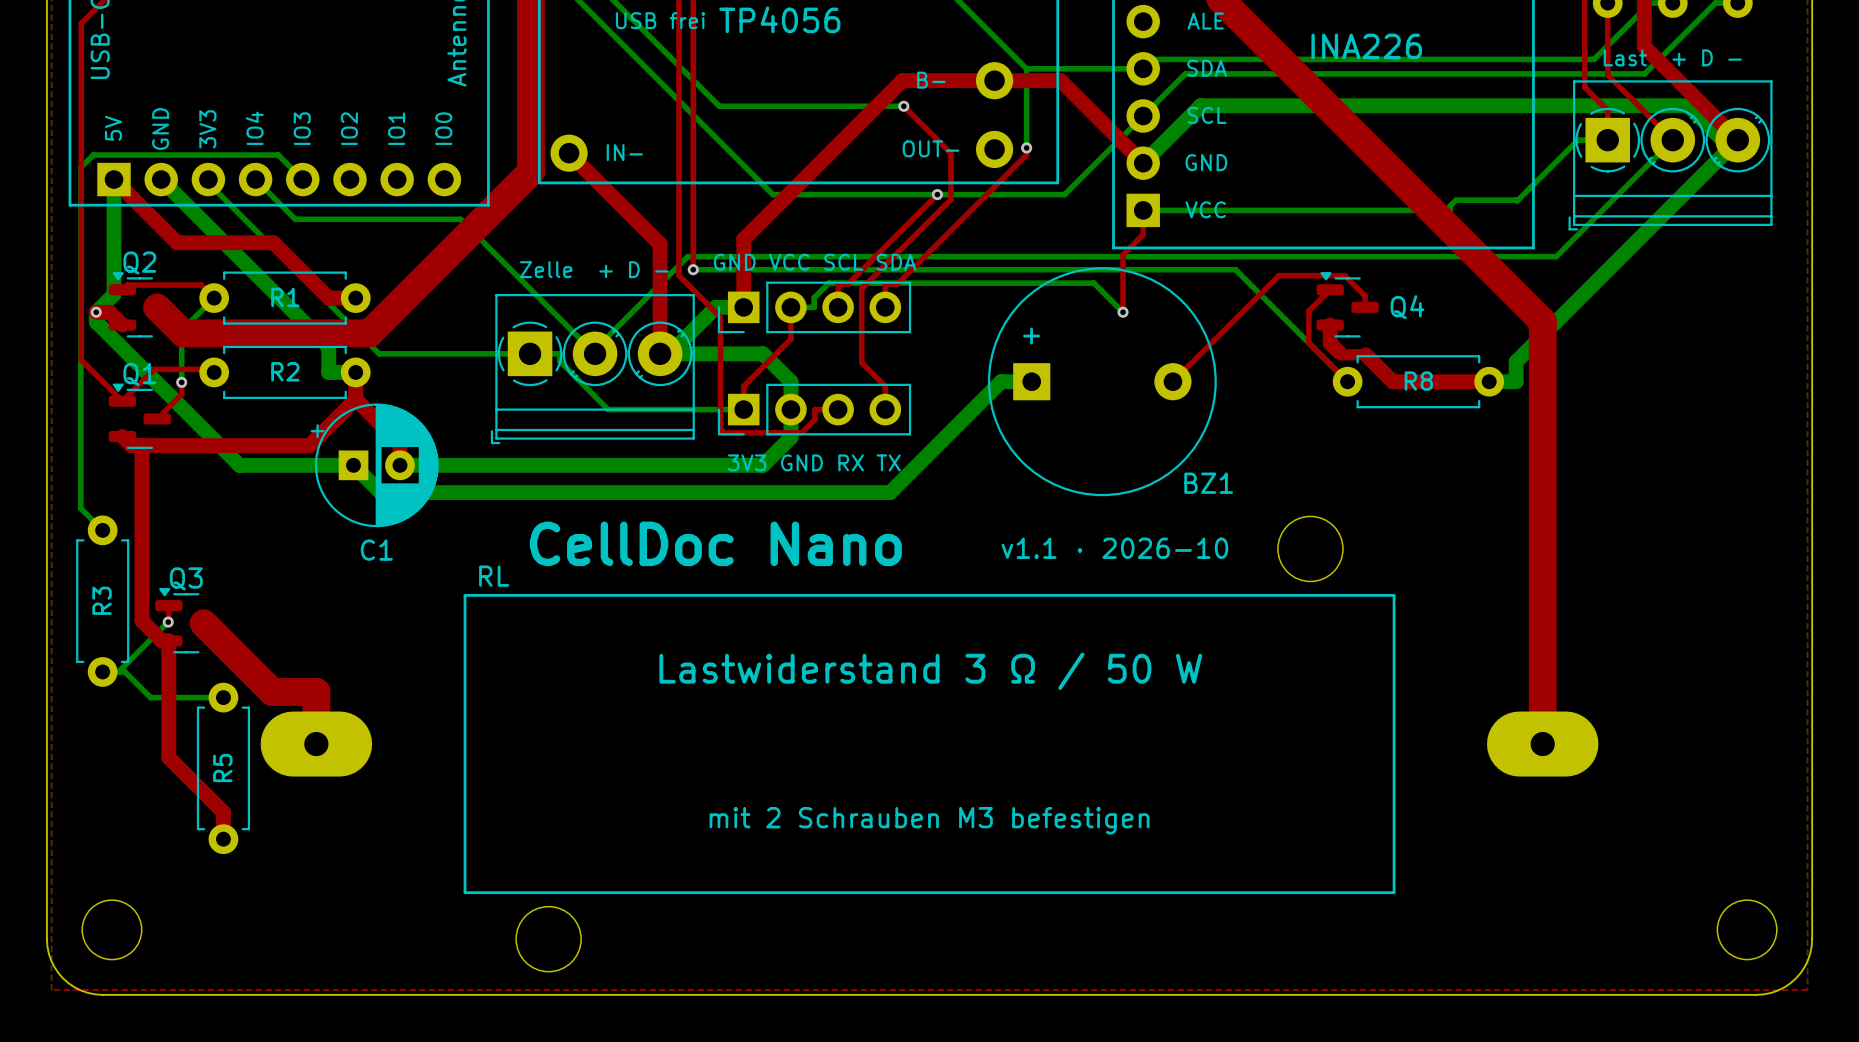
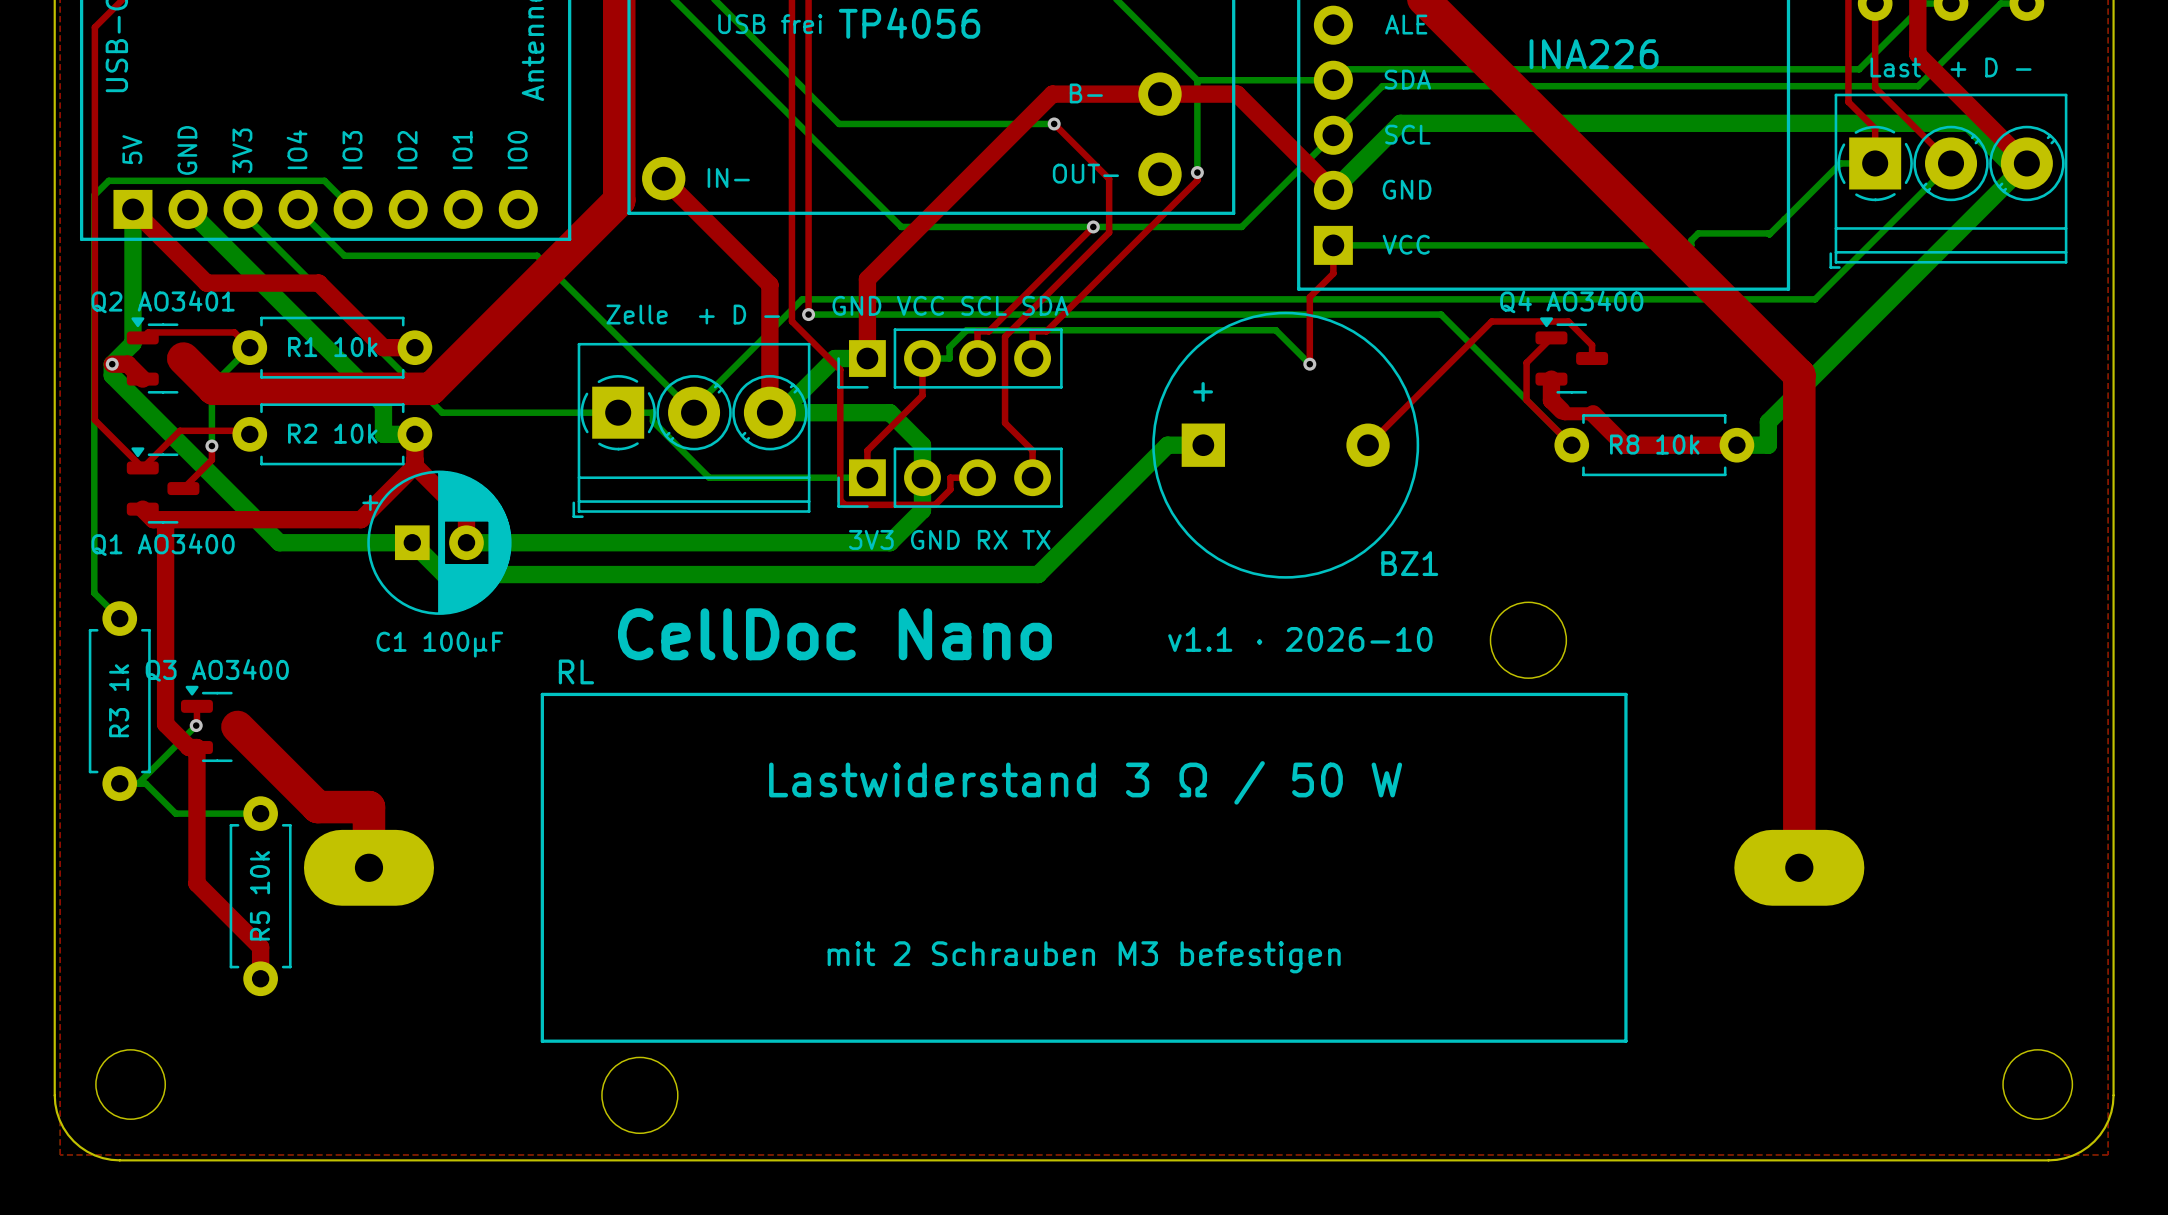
Q2 text: none -> Q2 AO3401 (163, 301)
Q4 text: none -> Q4 AO3400 (1571, 301)
Q2 name: Q2 (139, 262) -> none
R1 text: none -> R1 10k (332, 347)
R1 name: R1 (285, 297) -> none
Q4 name: Q4 (1407, 307) -> none
R2 text: none -> R2 10k (332, 433)
R2 name: R2 (285, 371) -> none
Q1 name: Q1 (139, 374) -> none
R8 text: none -> R8 10k (1654, 444)
R8 name: R8 (1418, 381) -> none
Q1 text: none -> Q1 AO3400 (163, 544)
C1 name: C1 (376, 550) -> none
C1 text: none -> C1 100µF (439, 644)
Q3 text: none -> Q3 AO3400 (217, 670)
Q3 name: Q3 (186, 578) -> none
R3 text: none -> R3 1k (119, 700)
R3 name: R3 (102, 600) -> none
R5 name: R5 (222, 767) -> none
R5 text: none -> R5 10k (259, 895)

